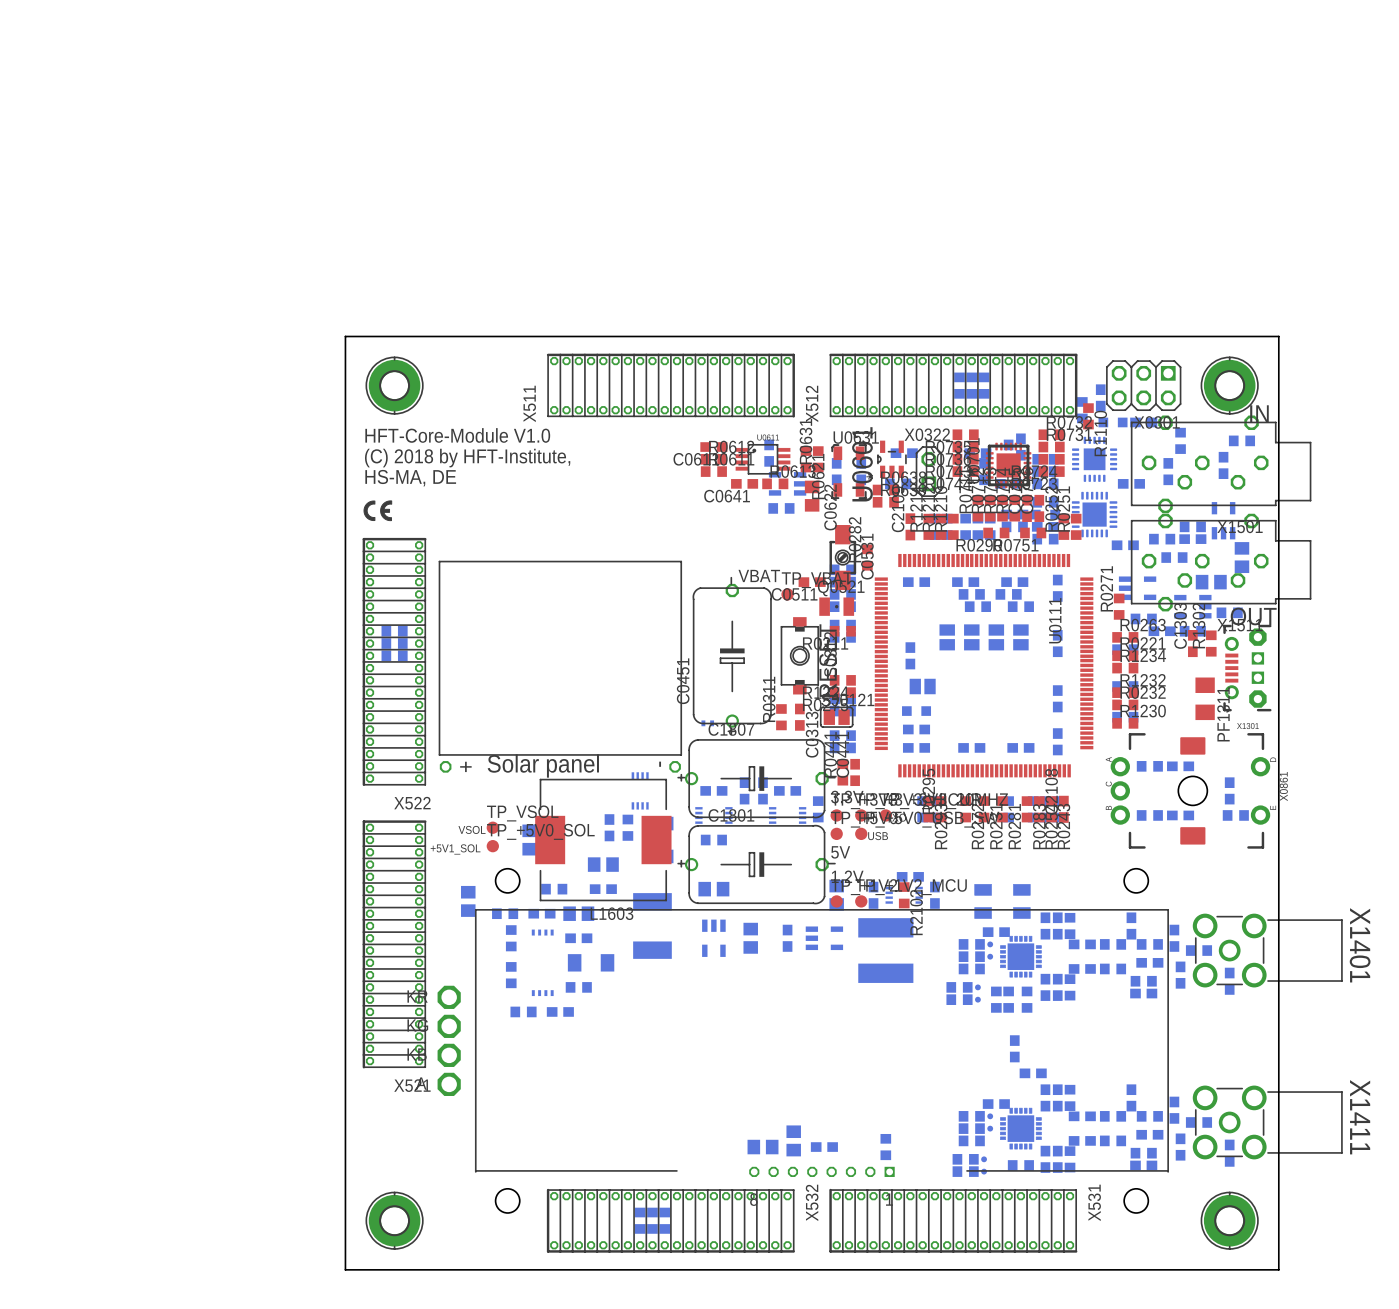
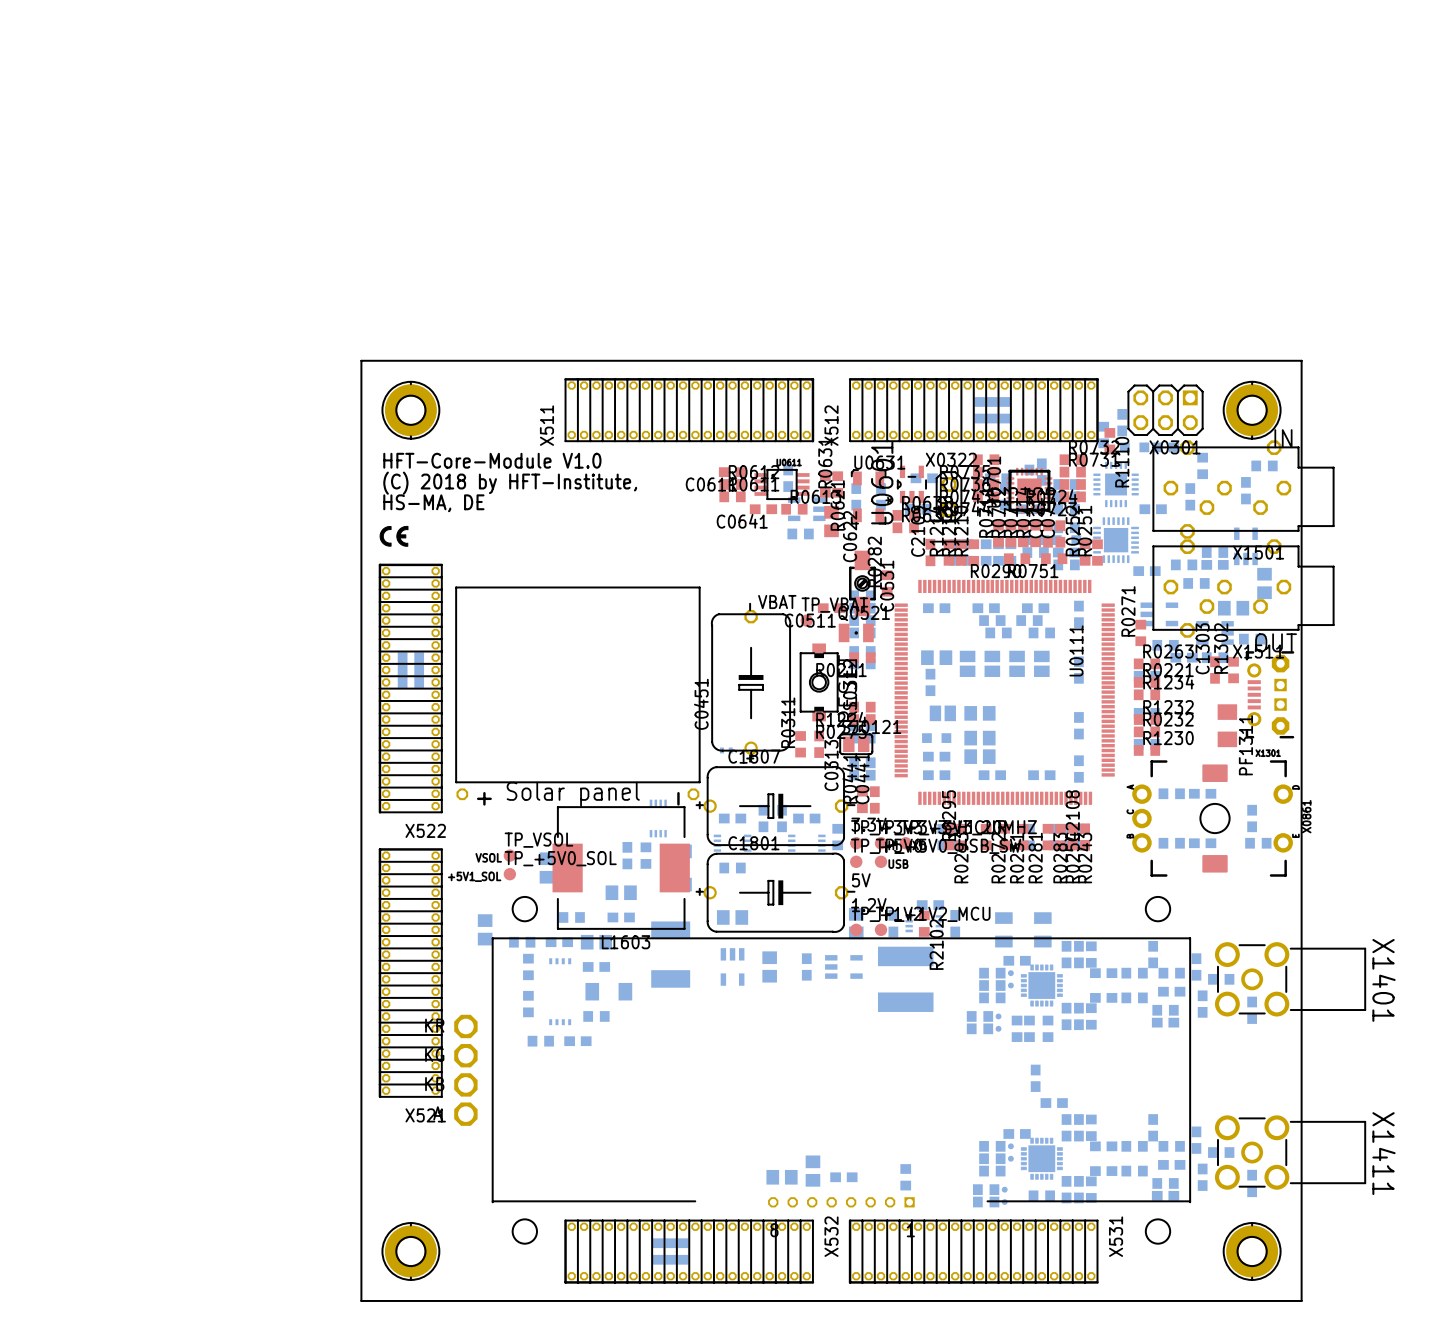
part: none -> (936, 657)
part: none -> (979, 713)
part: none -> (979, 738)
part: none -> (979, 756)

